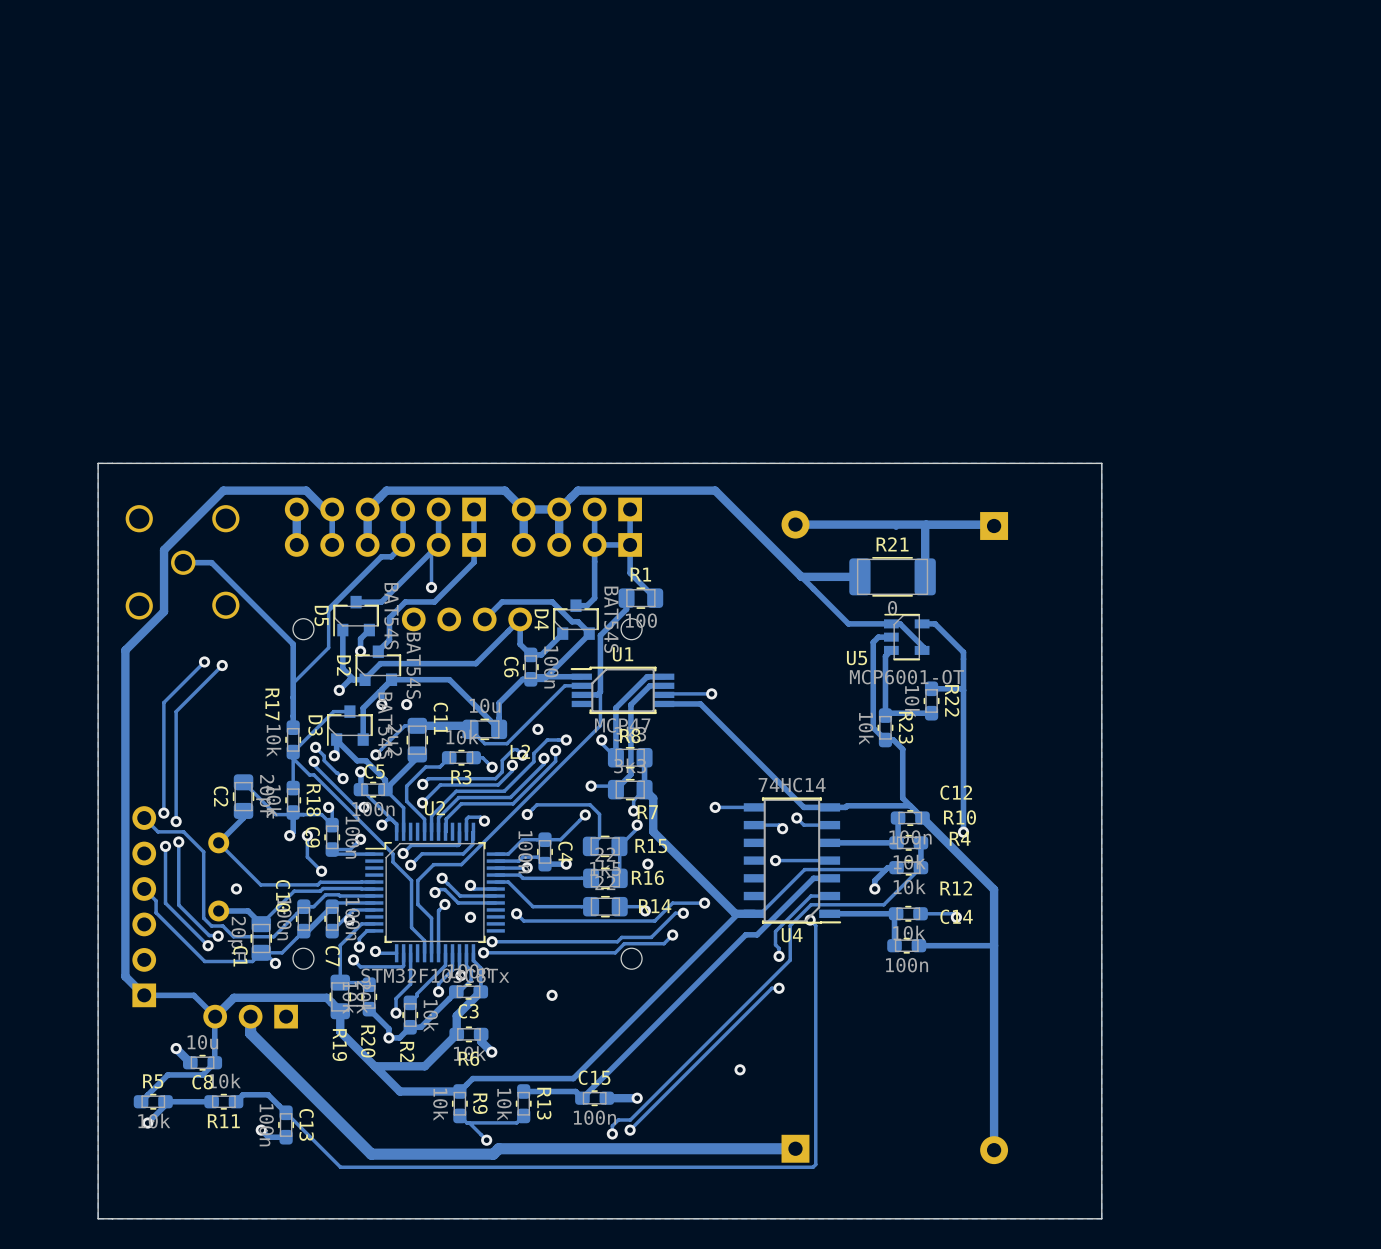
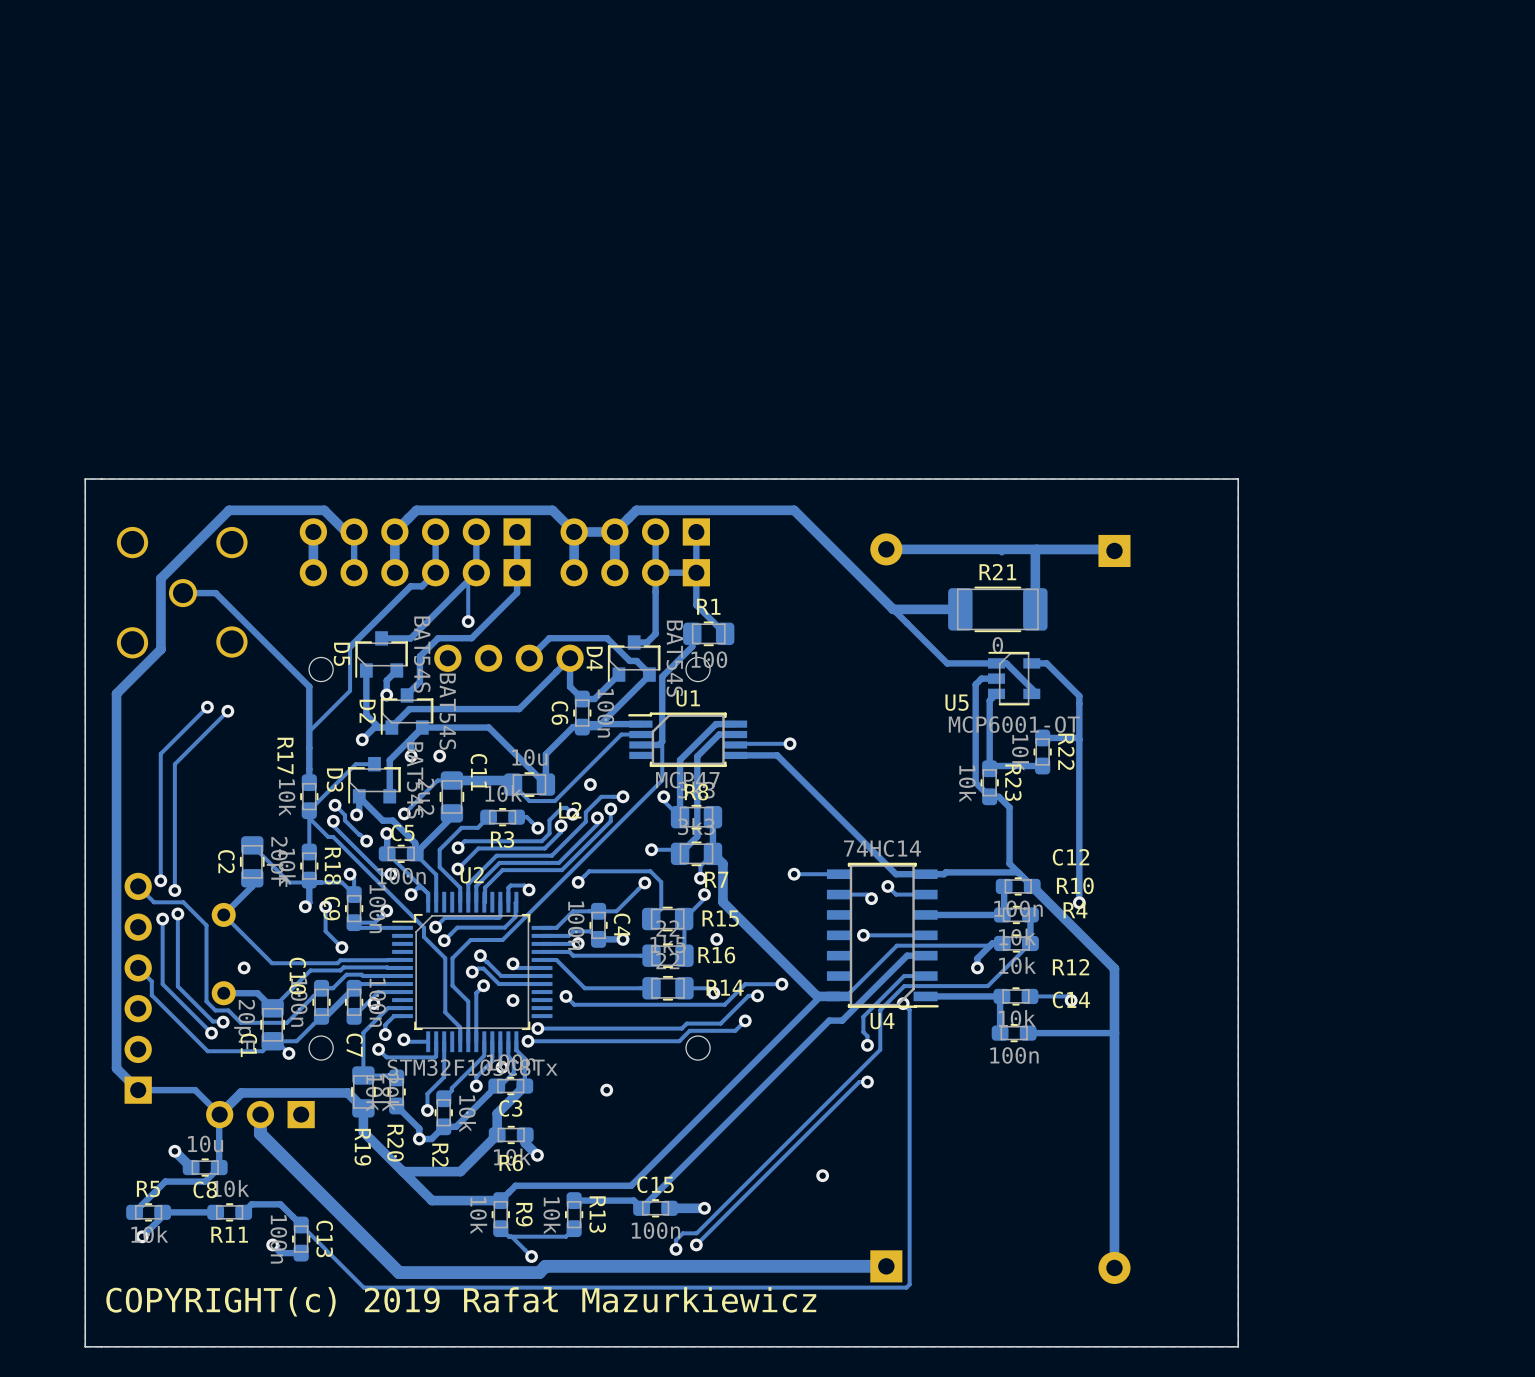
text: none -> COPYRIGHT(c) 2019 Rafał Mazurkiewicz (461, 1301)

